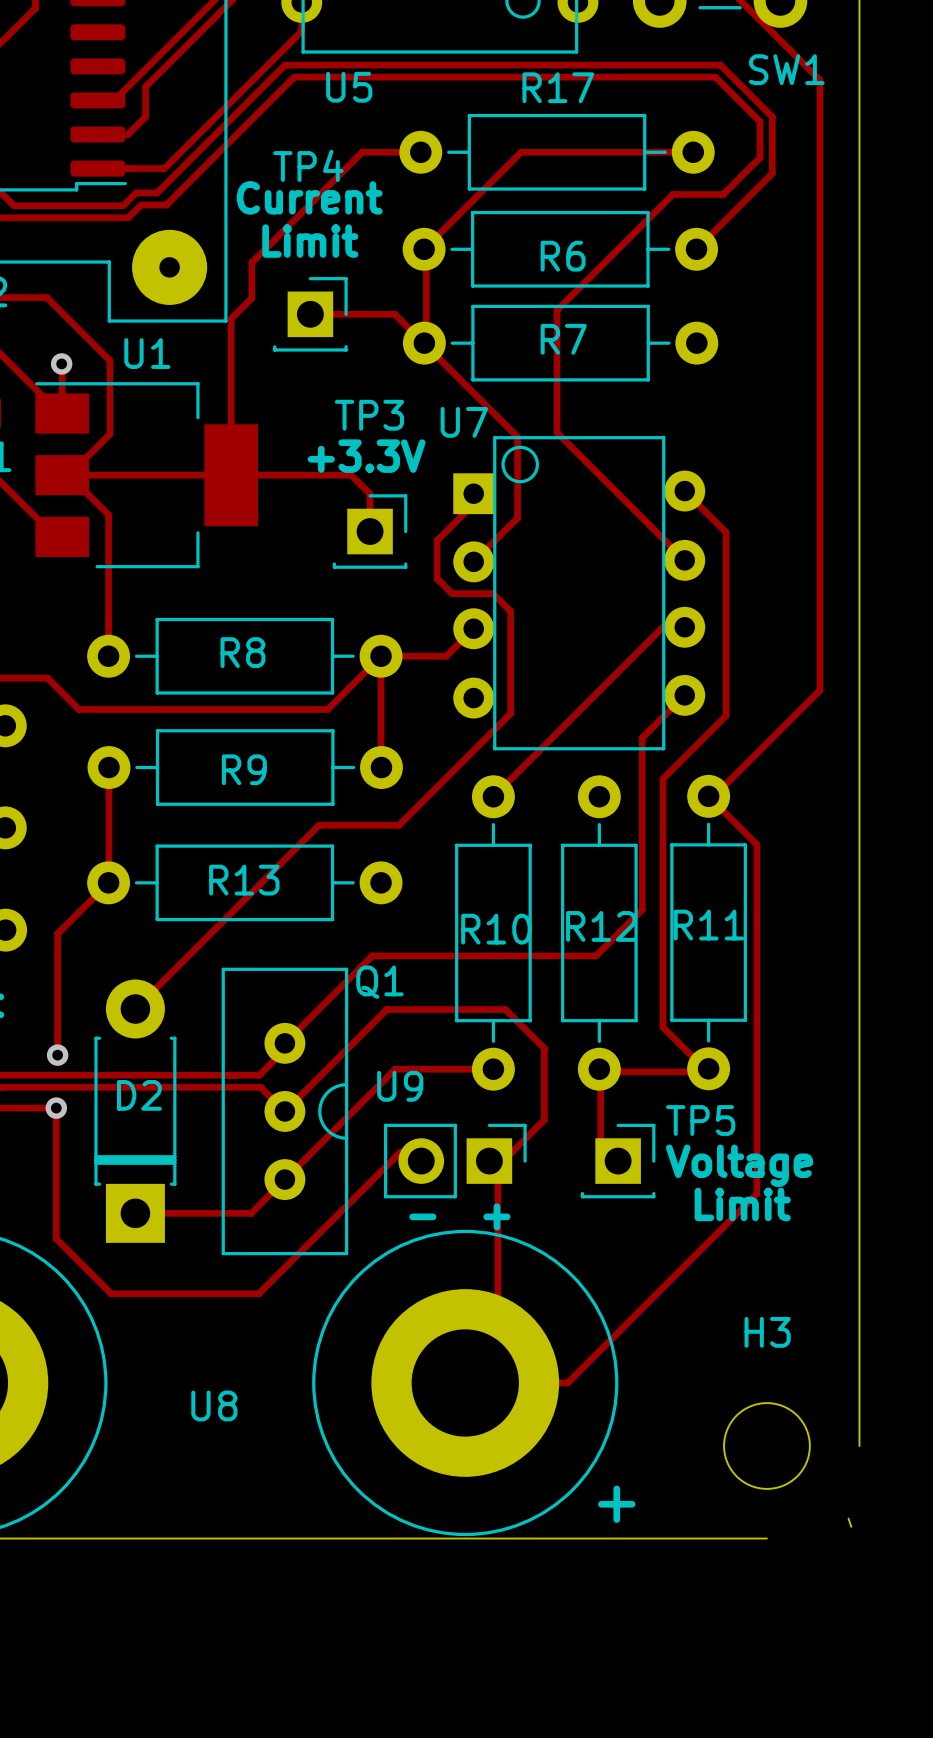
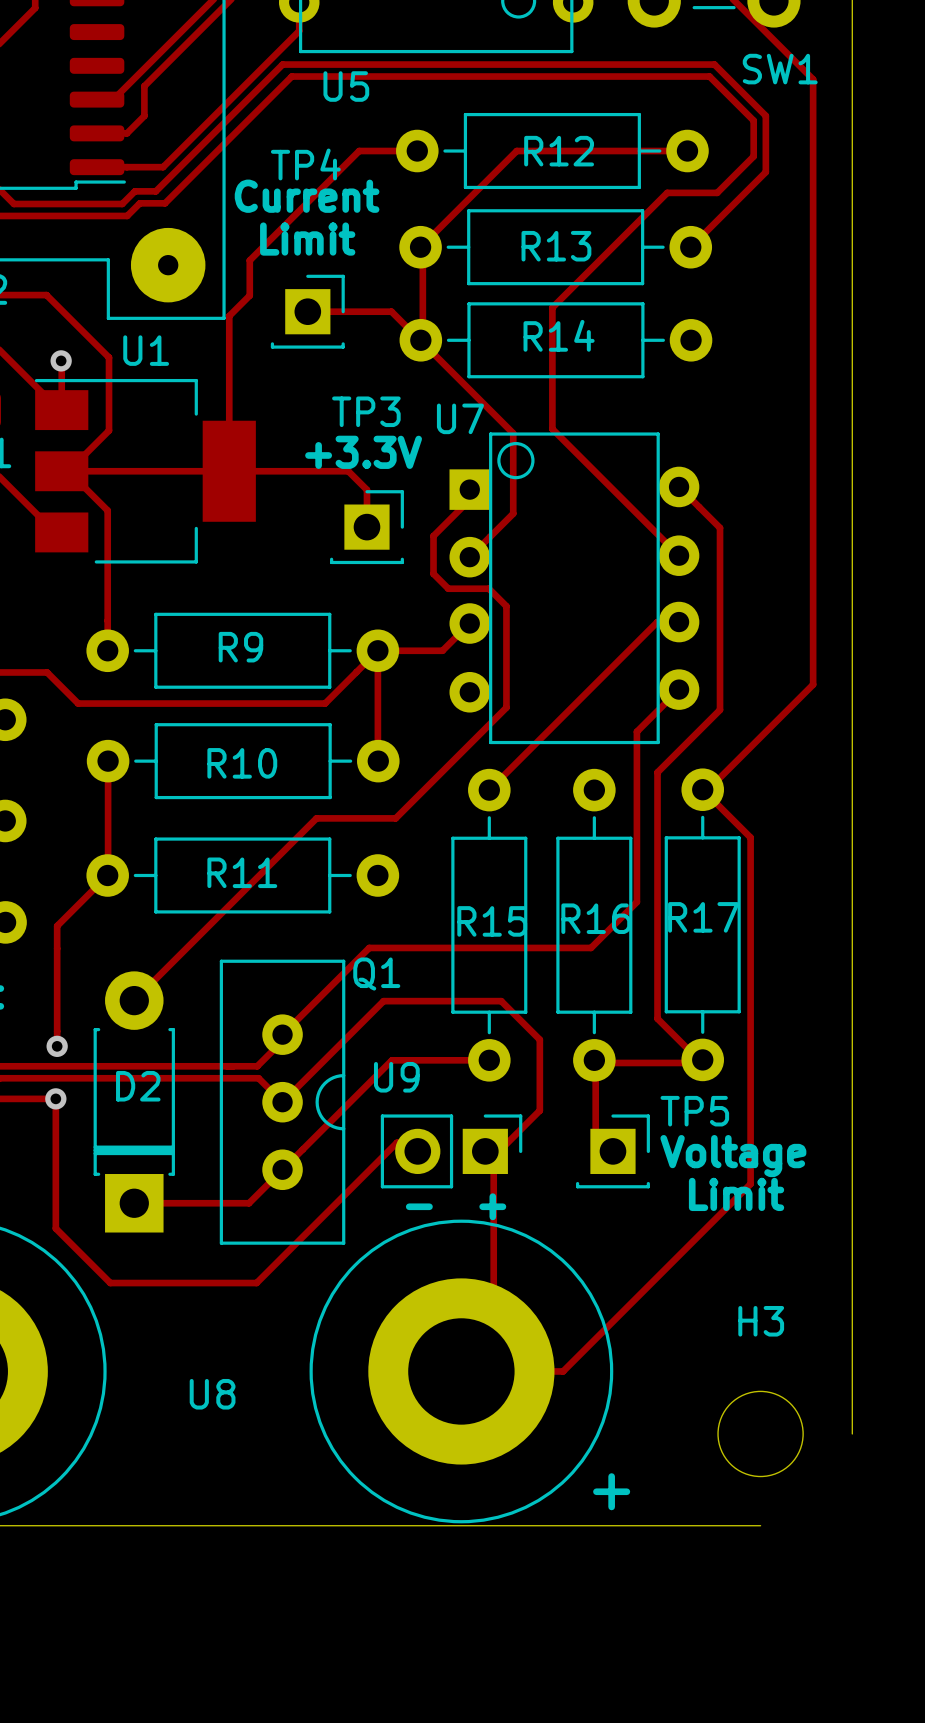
R17 name: R17 (558, 87) -> R12 (559, 151)
R6 name: R6 (563, 256) -> R13 (556, 246)
R7 name: R7 (563, 339) -> R14 (559, 335)
R8 name: R8 (242, 652) -> R9 (240, 647)
R9 name: R9 (244, 769) -> R10 (242, 763)
R13 name: R13 (244, 880) -> R11 (242, 872)
R11 name: R11 (708, 925) -> R17 (703, 917)
R12 name: R12 (601, 926) -> R16 (596, 918)
R10 name: R10 (496, 929) -> R15 (492, 921)
board edge: (848, 1518) (851, 1526) -> none

